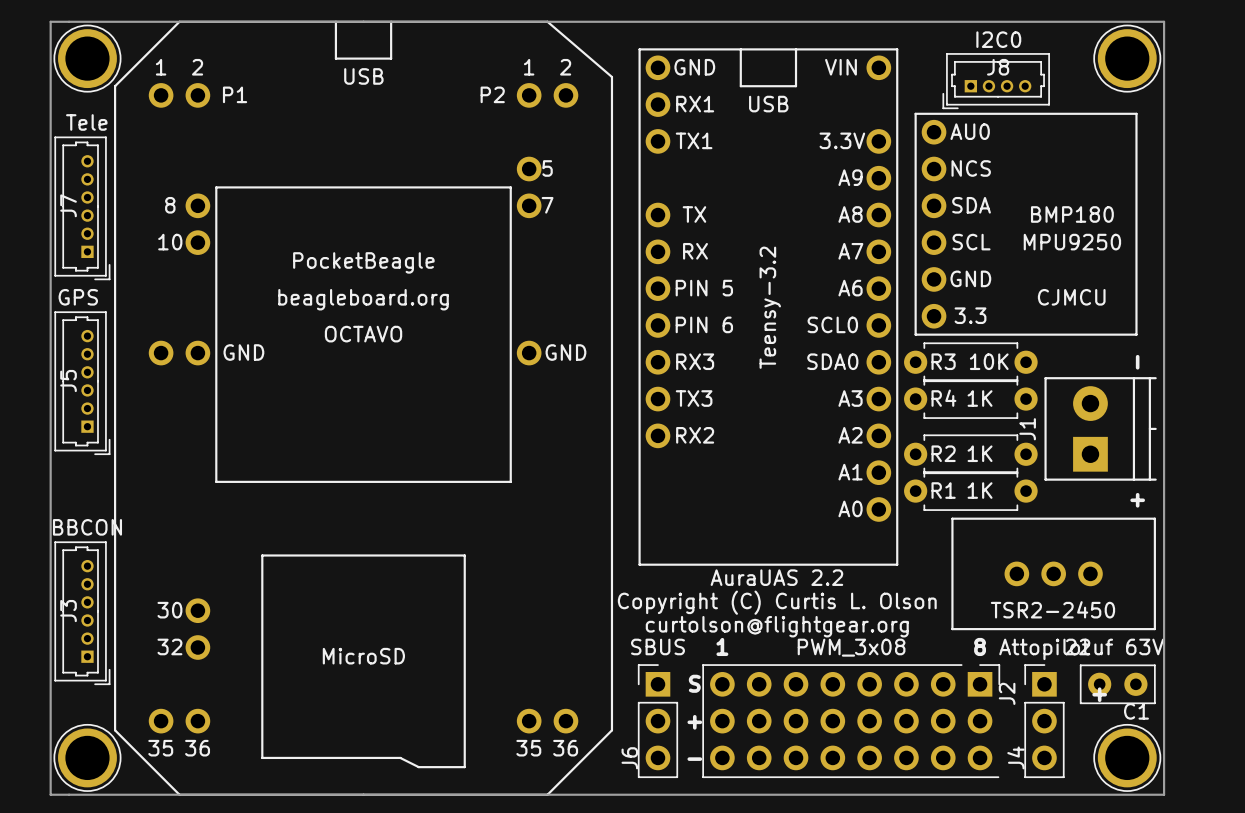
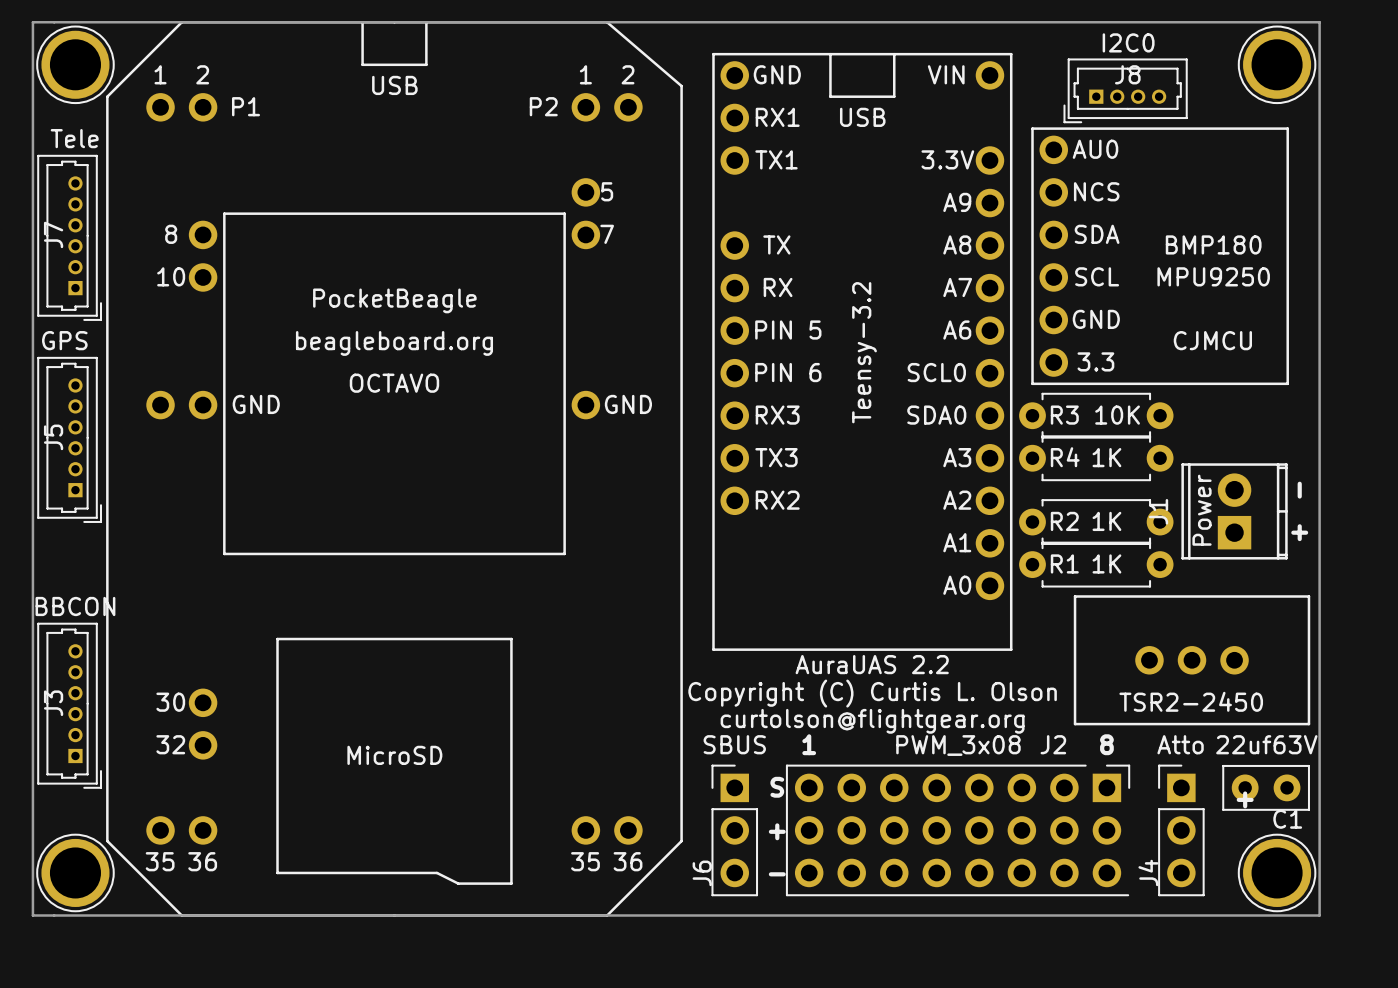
text position: - (1137, 362) -> - (1299, 490)
J1 footprint: [1044, 377, 1157, 481] -> [1181, 463, 1288, 560]
J1 value: none -> Power (1202, 510)
text position: + (1137, 500) -> + (1299, 532)
C1 value: 22uf 63V (1114, 646) -> 22uf63V (1266, 744)
J4 value: Attopilot (1044, 649) -> Atto (1180, 744)
J2 name rotation: 0° (1007, 693) -> 90° clockwise (1053, 744)
J2 name position: J2 (1007, 693) -> J2 (1053, 744)

